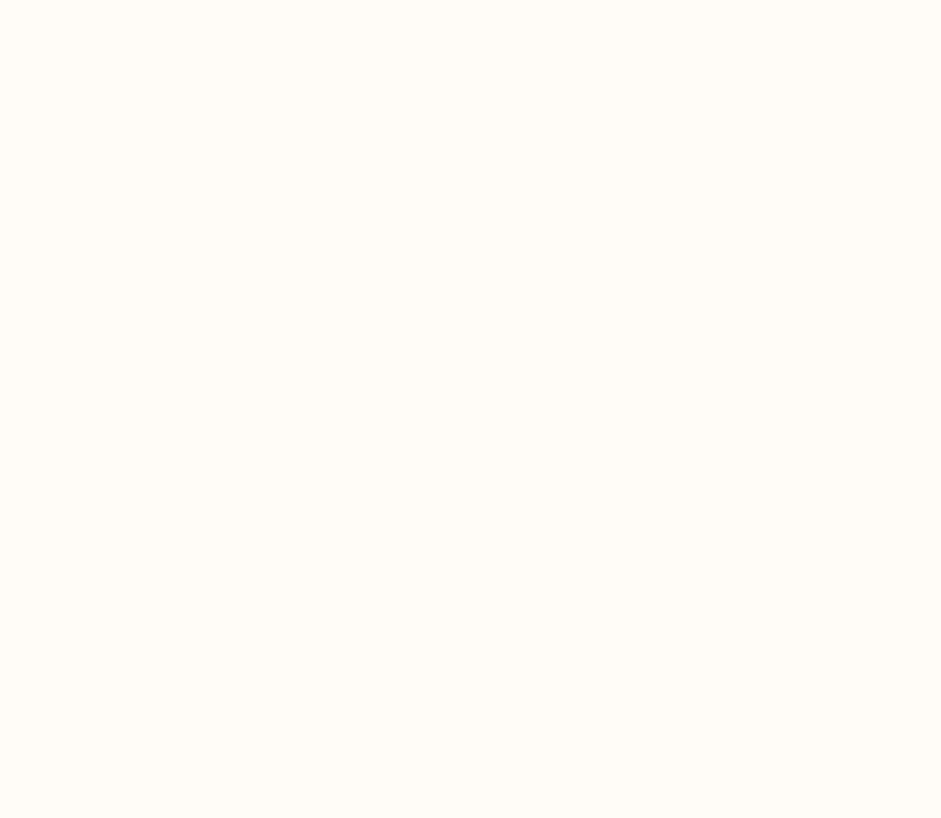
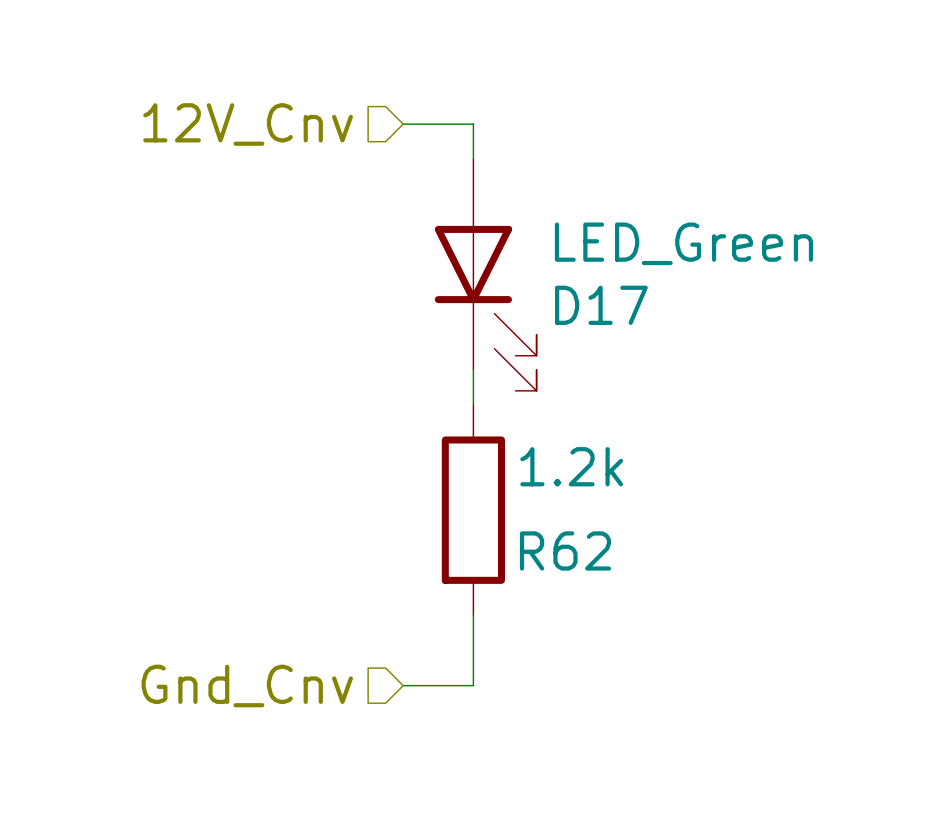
hierarchical label: none -> 12V_Cnv (248, 124)
wire: none -> (403, 124) (473, 124) (473, 159)
D17: none -> LED_Green (485, 275)
wire: none -> (473, 369) (473, 404)
R62: none -> 1.2k (473, 510)
wire: none -> (473, 615) (473, 685) (403, 685)
hierarchical label: none -> Gnd_Cnv (247, 686)

